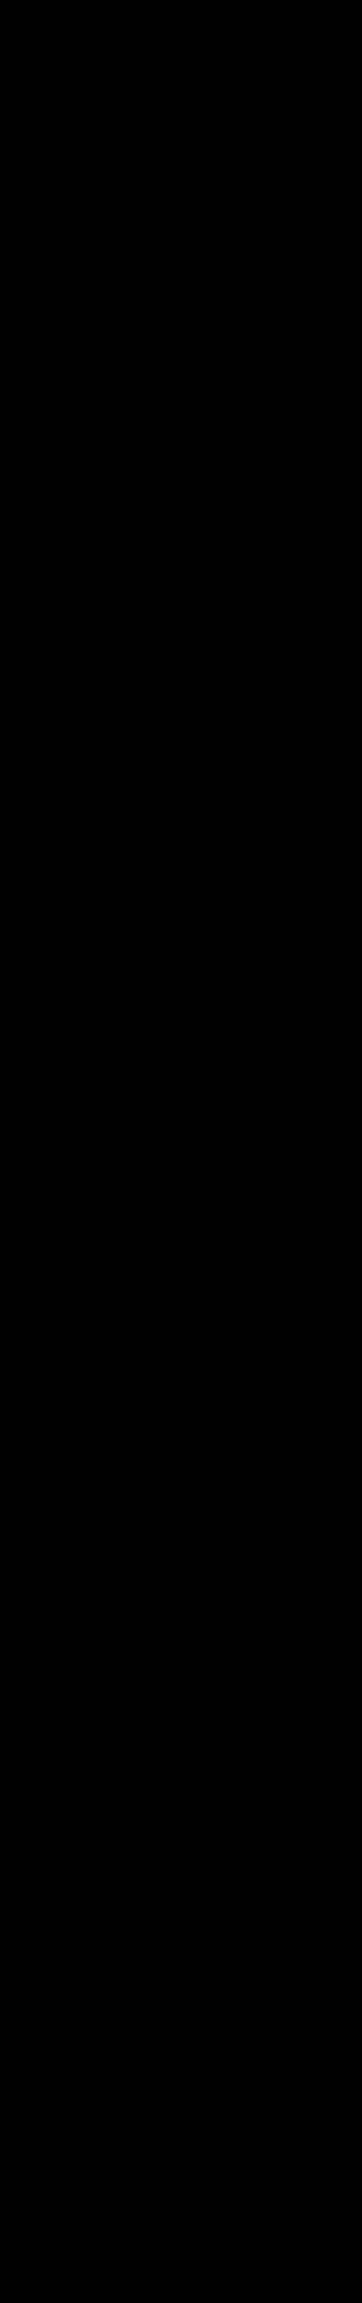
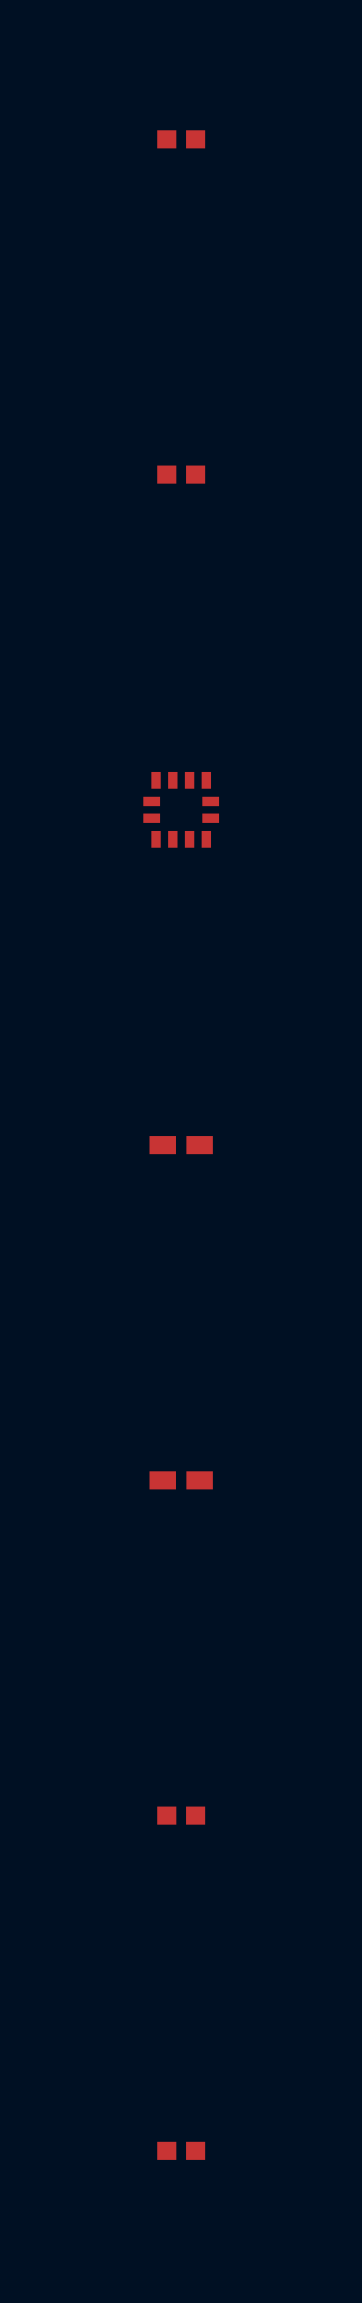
part: none -> (181, 139)
part: none -> (181, 474)
part: none -> (181, 809)
part: none -> (181, 1145)
part: none -> (181, 1480)
part: none -> (181, 1815)
part: none -> (181, 2150)

